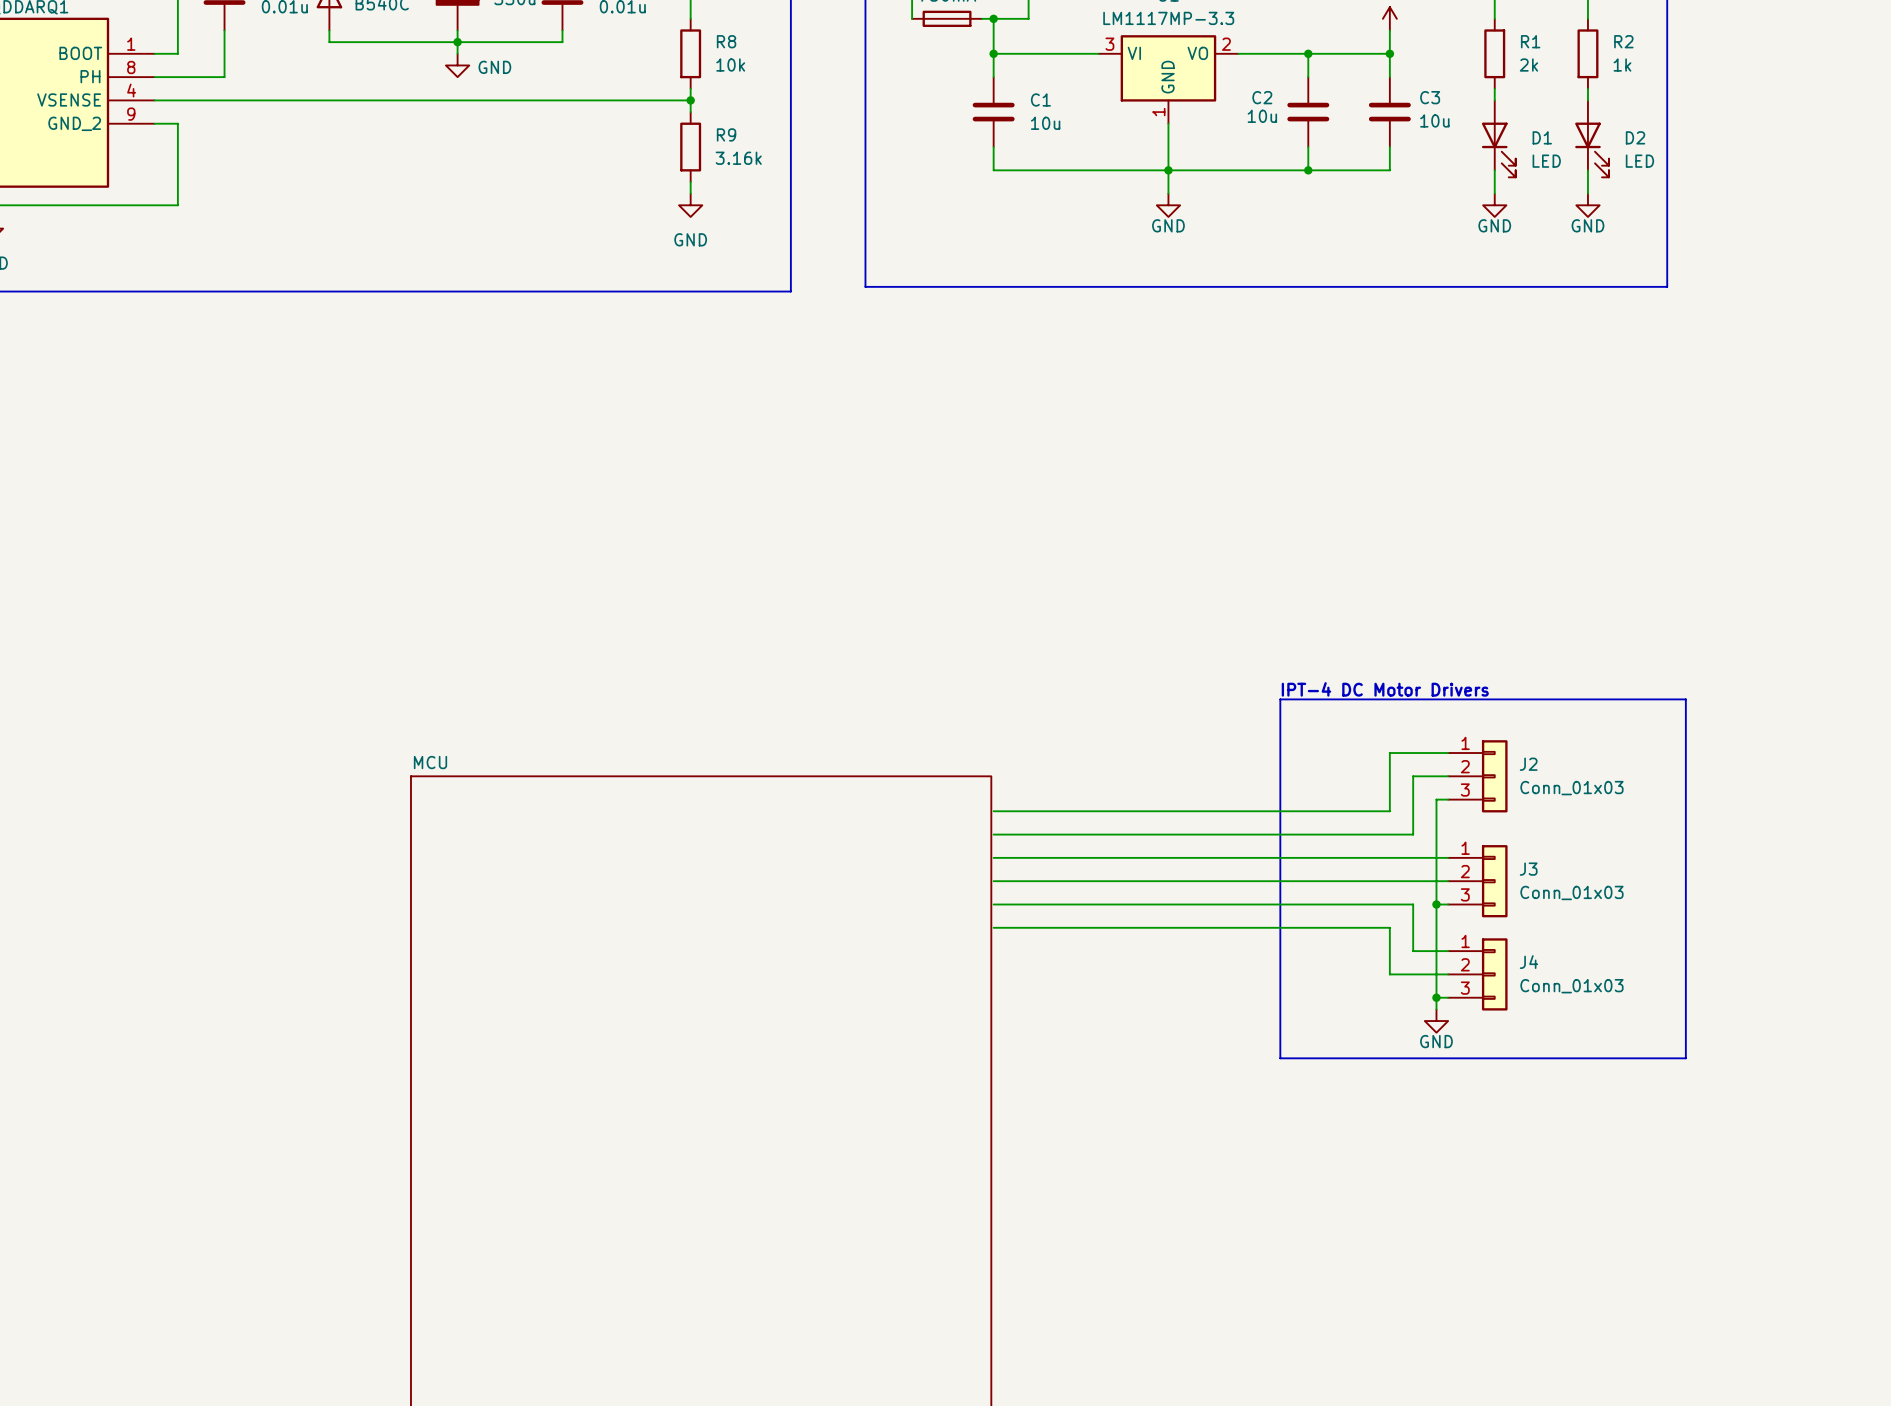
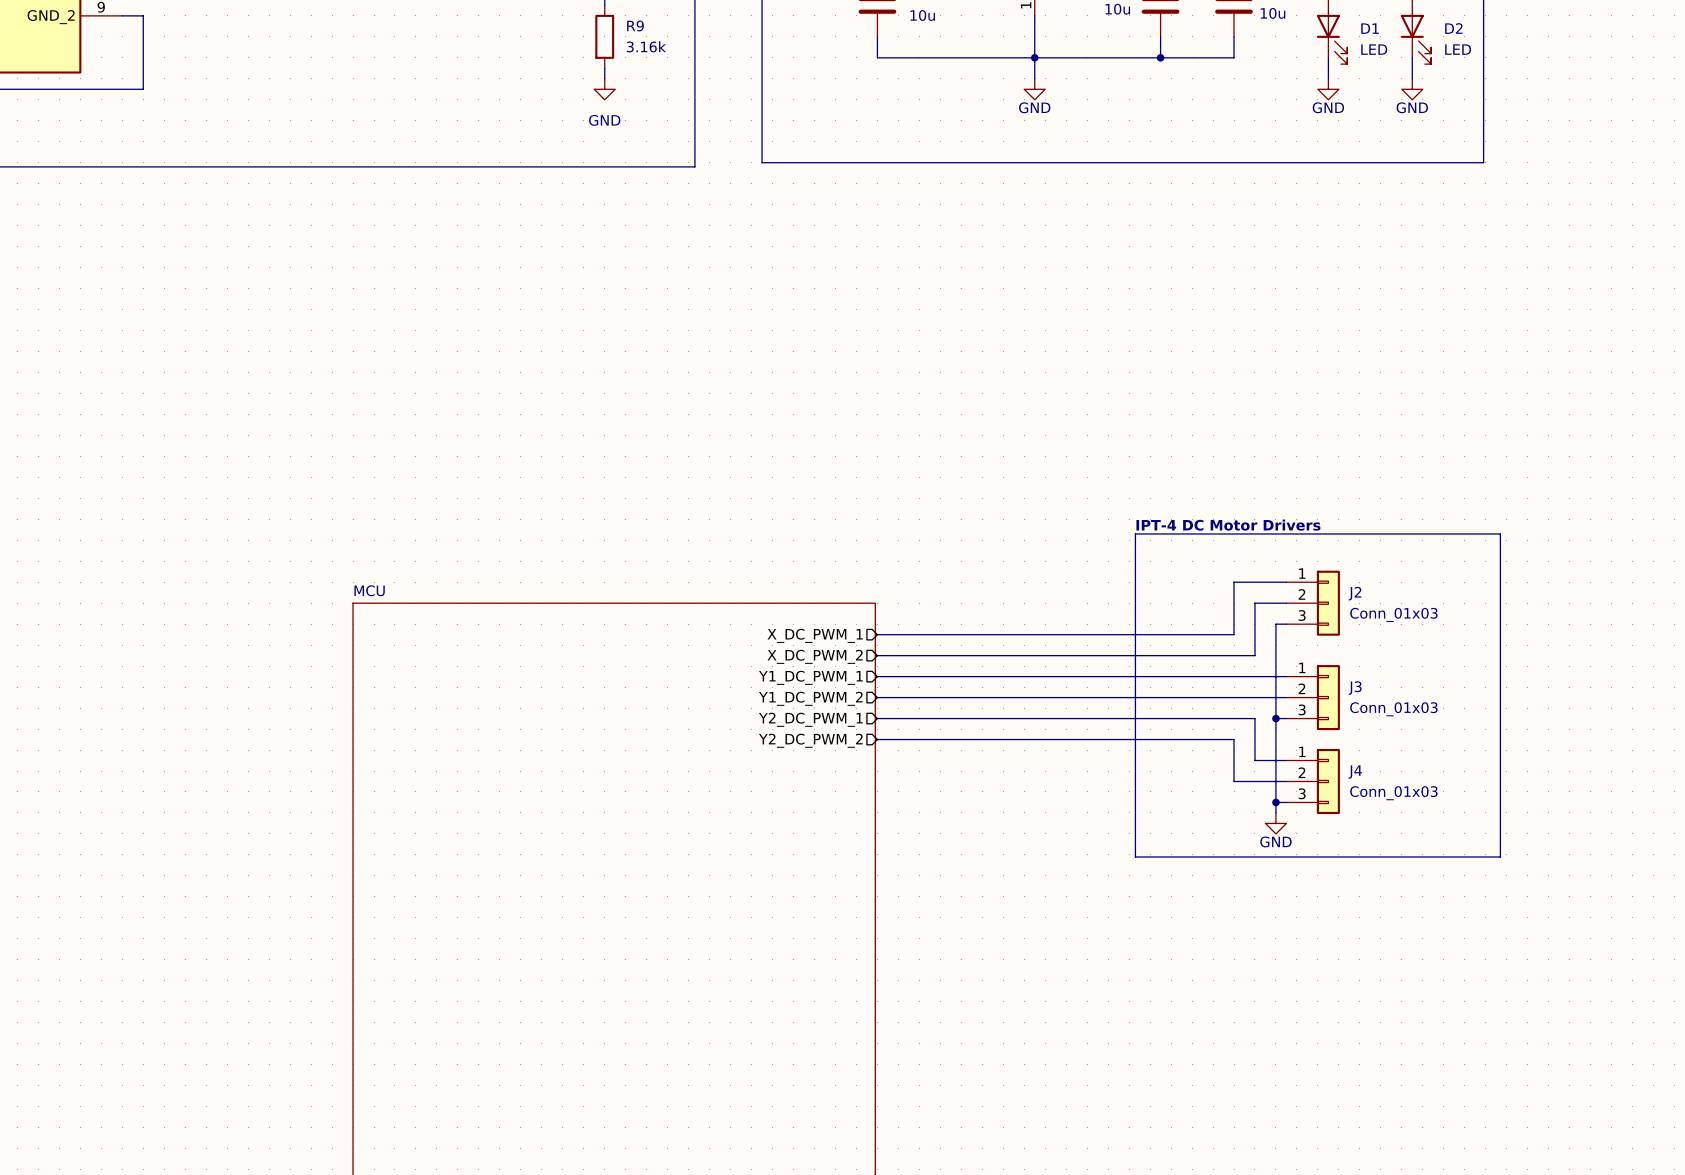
sheet pin: none -> X_DC_PWM_1 (815, 635)
sheet pin: none -> X_DC_PWM_2 (815, 656)
sheet pin: none -> Y1_DC_PWM_1 (810, 677)
sheet pin: none -> Y1_DC_PWM_2 (810, 698)
sheet pin: none -> Y2_DC_PWM_1 (810, 719)
sheet pin: none -> Y2_DC_PWM_2 (810, 740)

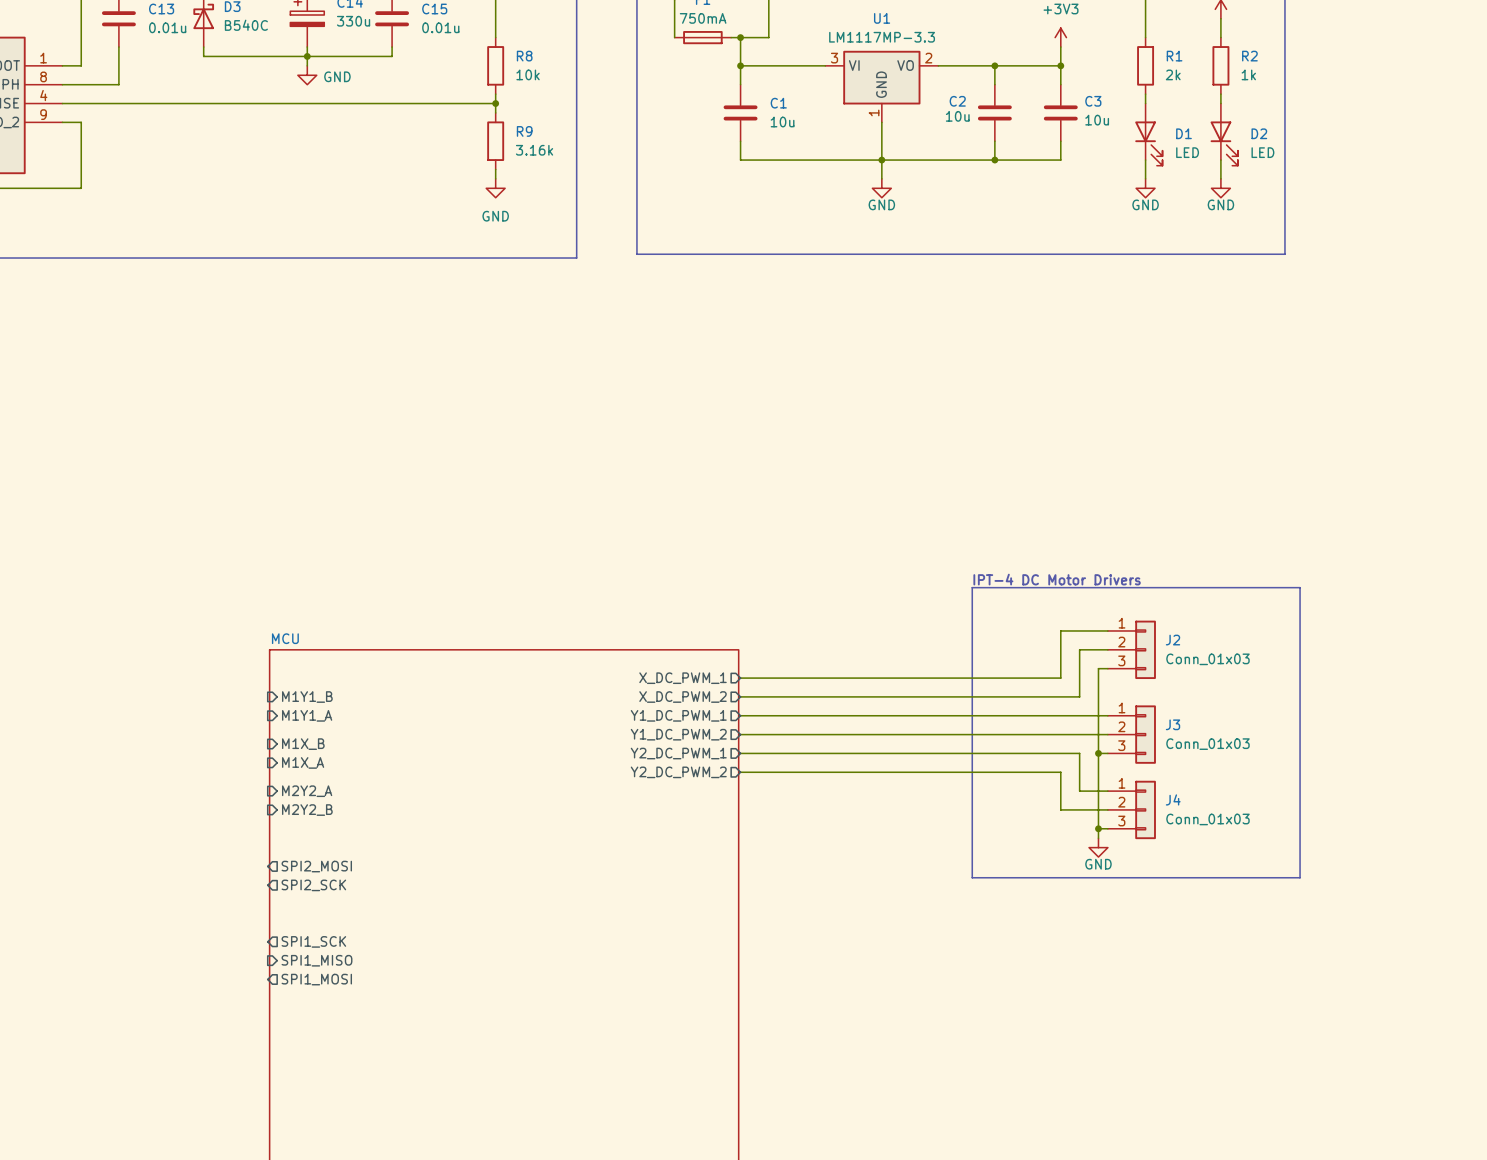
sheet pin: none -> M1Y1_B (307, 697)
sheet pin: none -> M1Y1_A (307, 715)
sheet pin: none -> M1X_B (303, 744)
sheet pin: none -> M1X_A (303, 762)
sheet pin: none -> M2Y2_A (307, 791)
sheet pin: none -> M2Y2_B (307, 810)
sheet pin: none -> SPI2_MOSI (316, 866)
sheet pin: none -> SPI2_SCK (313, 885)
sheet pin: none -> SPI1_SCK (313, 941)
sheet pin: none -> SPI1_MISO (317, 960)
sheet pin: none -> SPI1_MOSI (316, 979)

